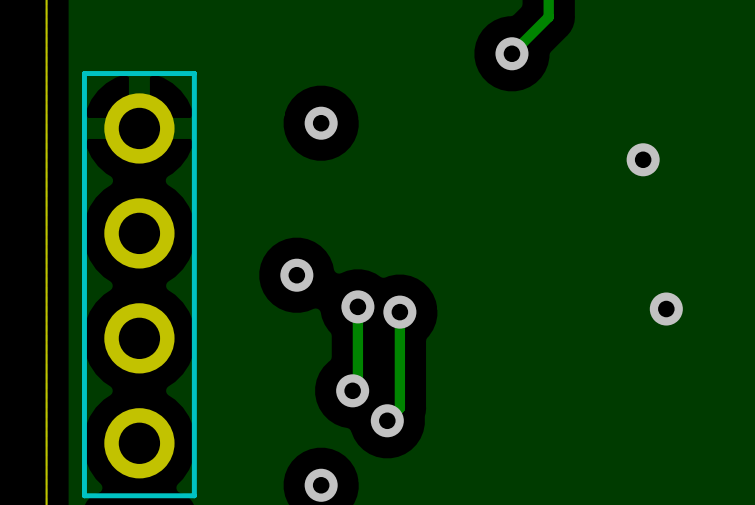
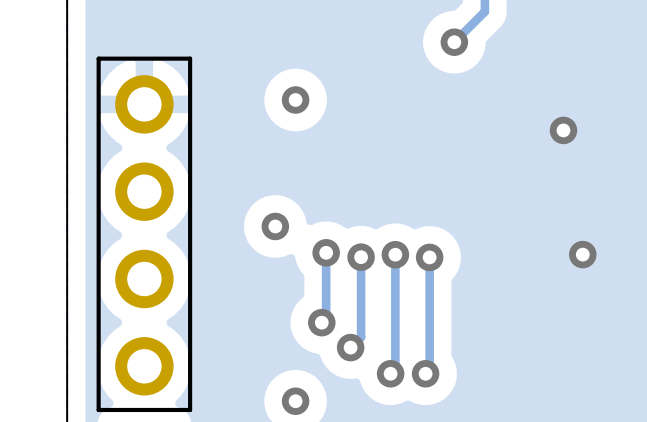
track: none -> (395, 254) (395, 369) (390, 373)
via: none -> (395, 254)
track: none -> (429, 257) (429, 369) (425, 373)
via: none -> (429, 257)
via: none -> (390, 373)
via: none -> (425, 373)

